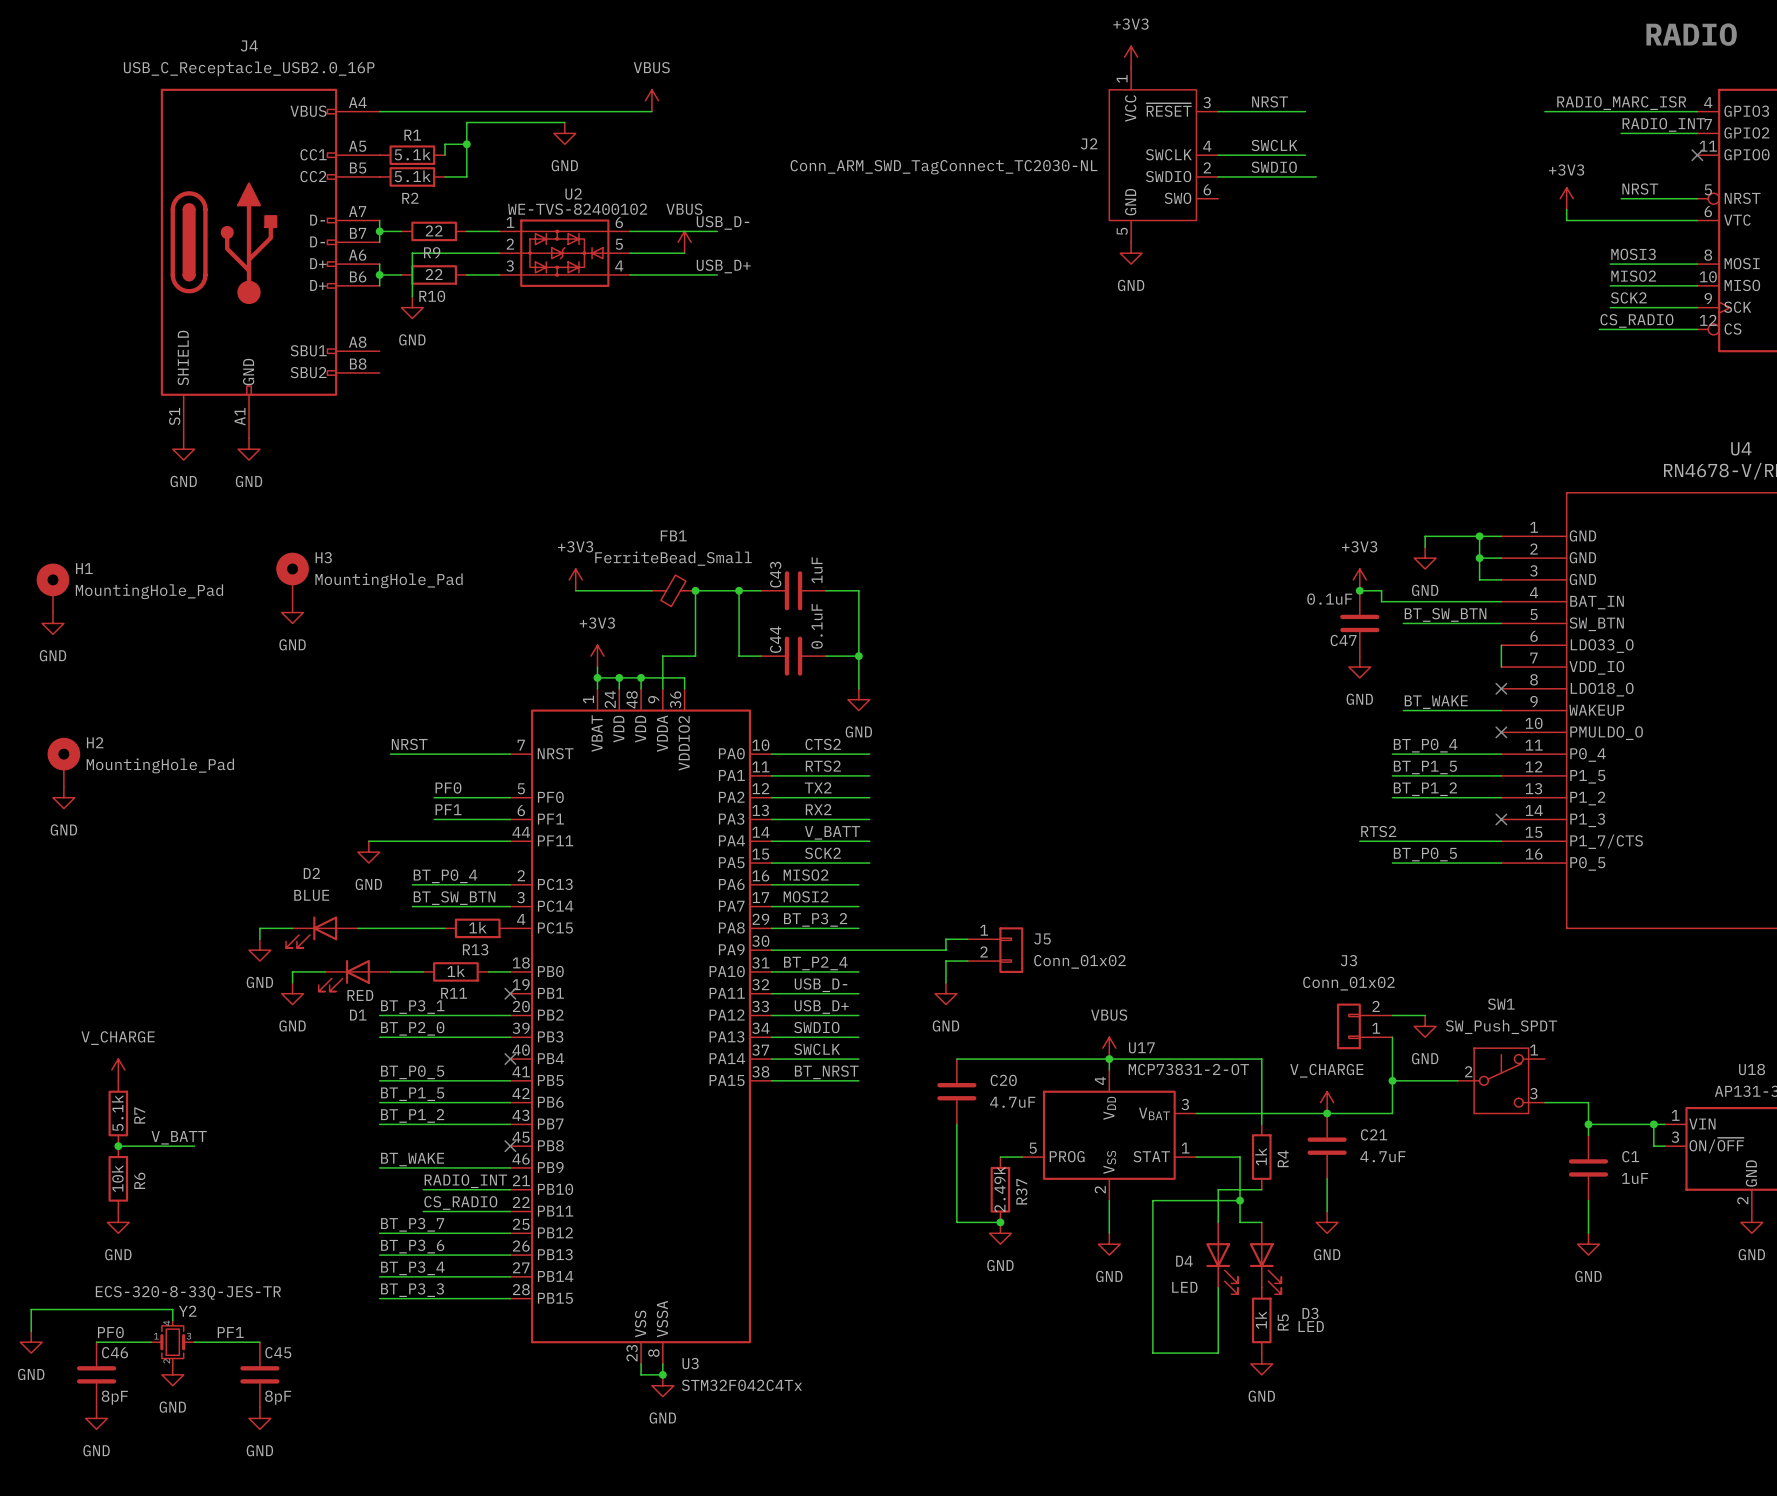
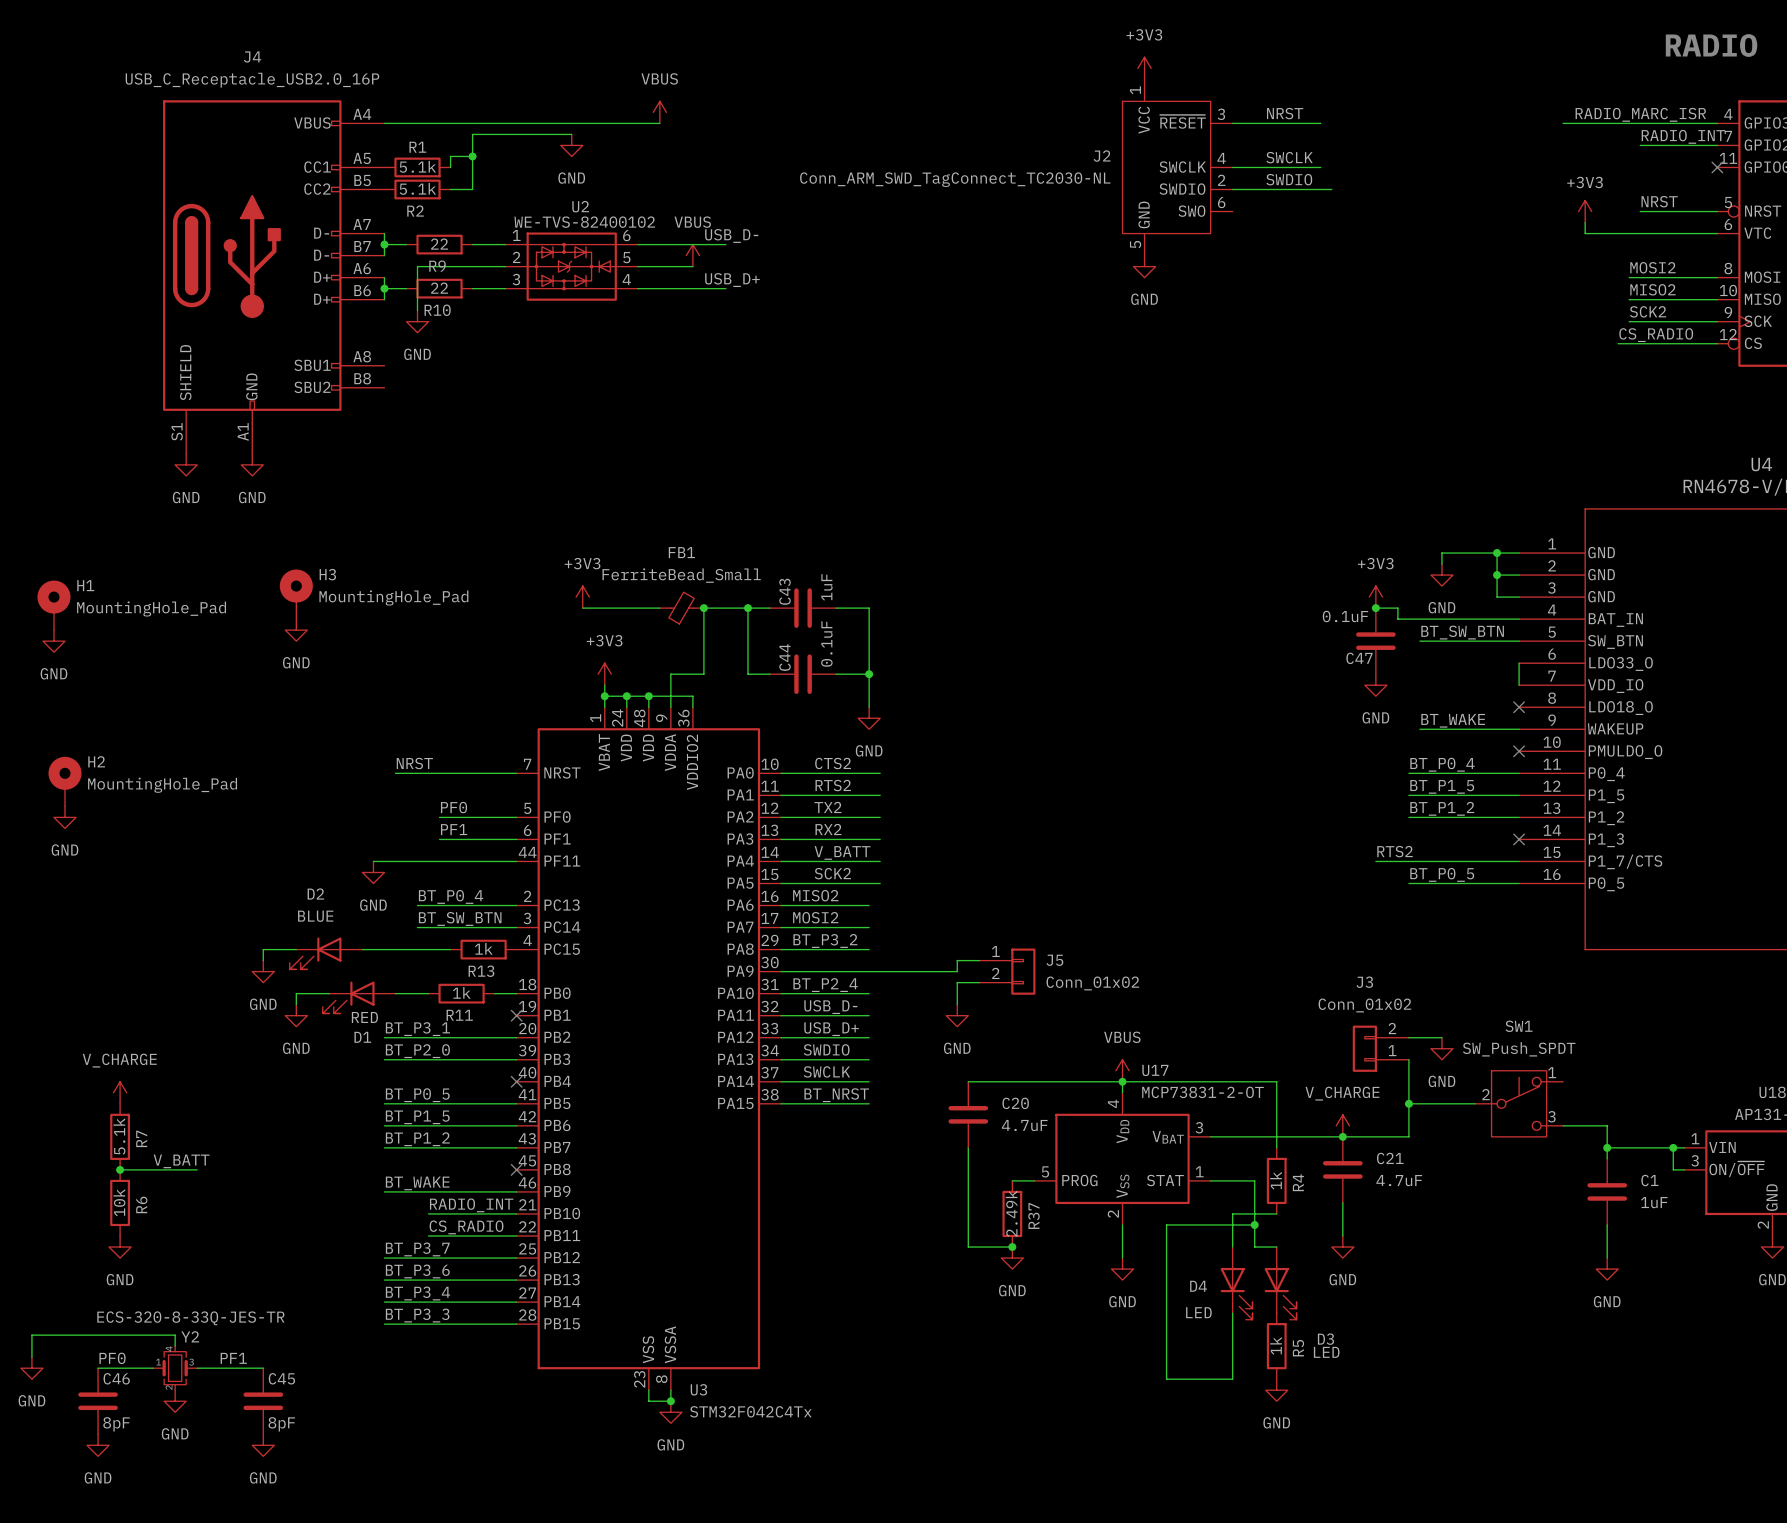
label: MOSI3 (1633, 254) -> MOSI2 (1652, 267)

